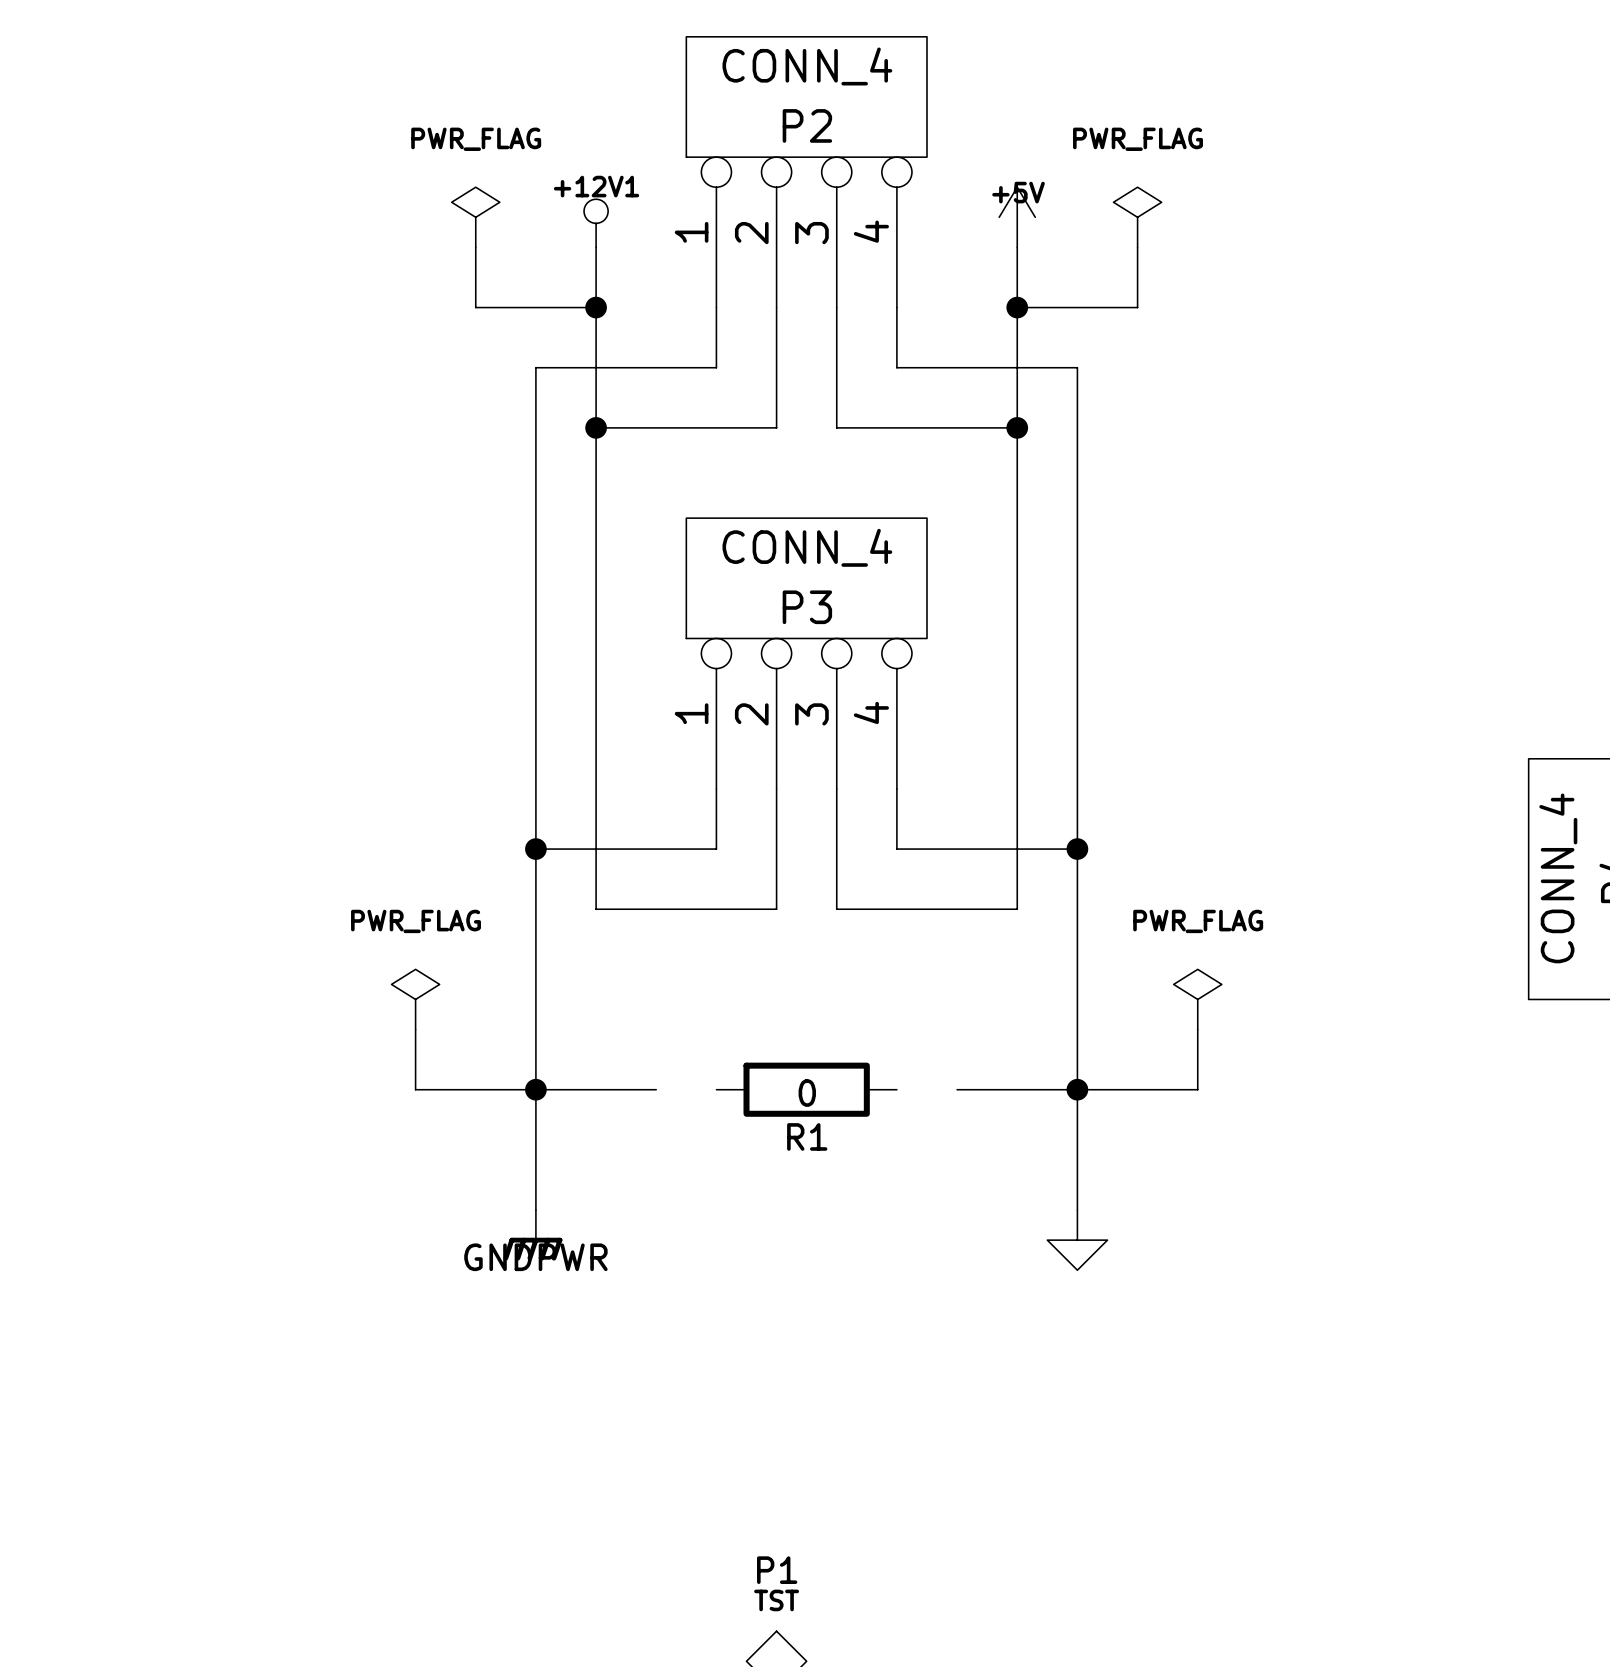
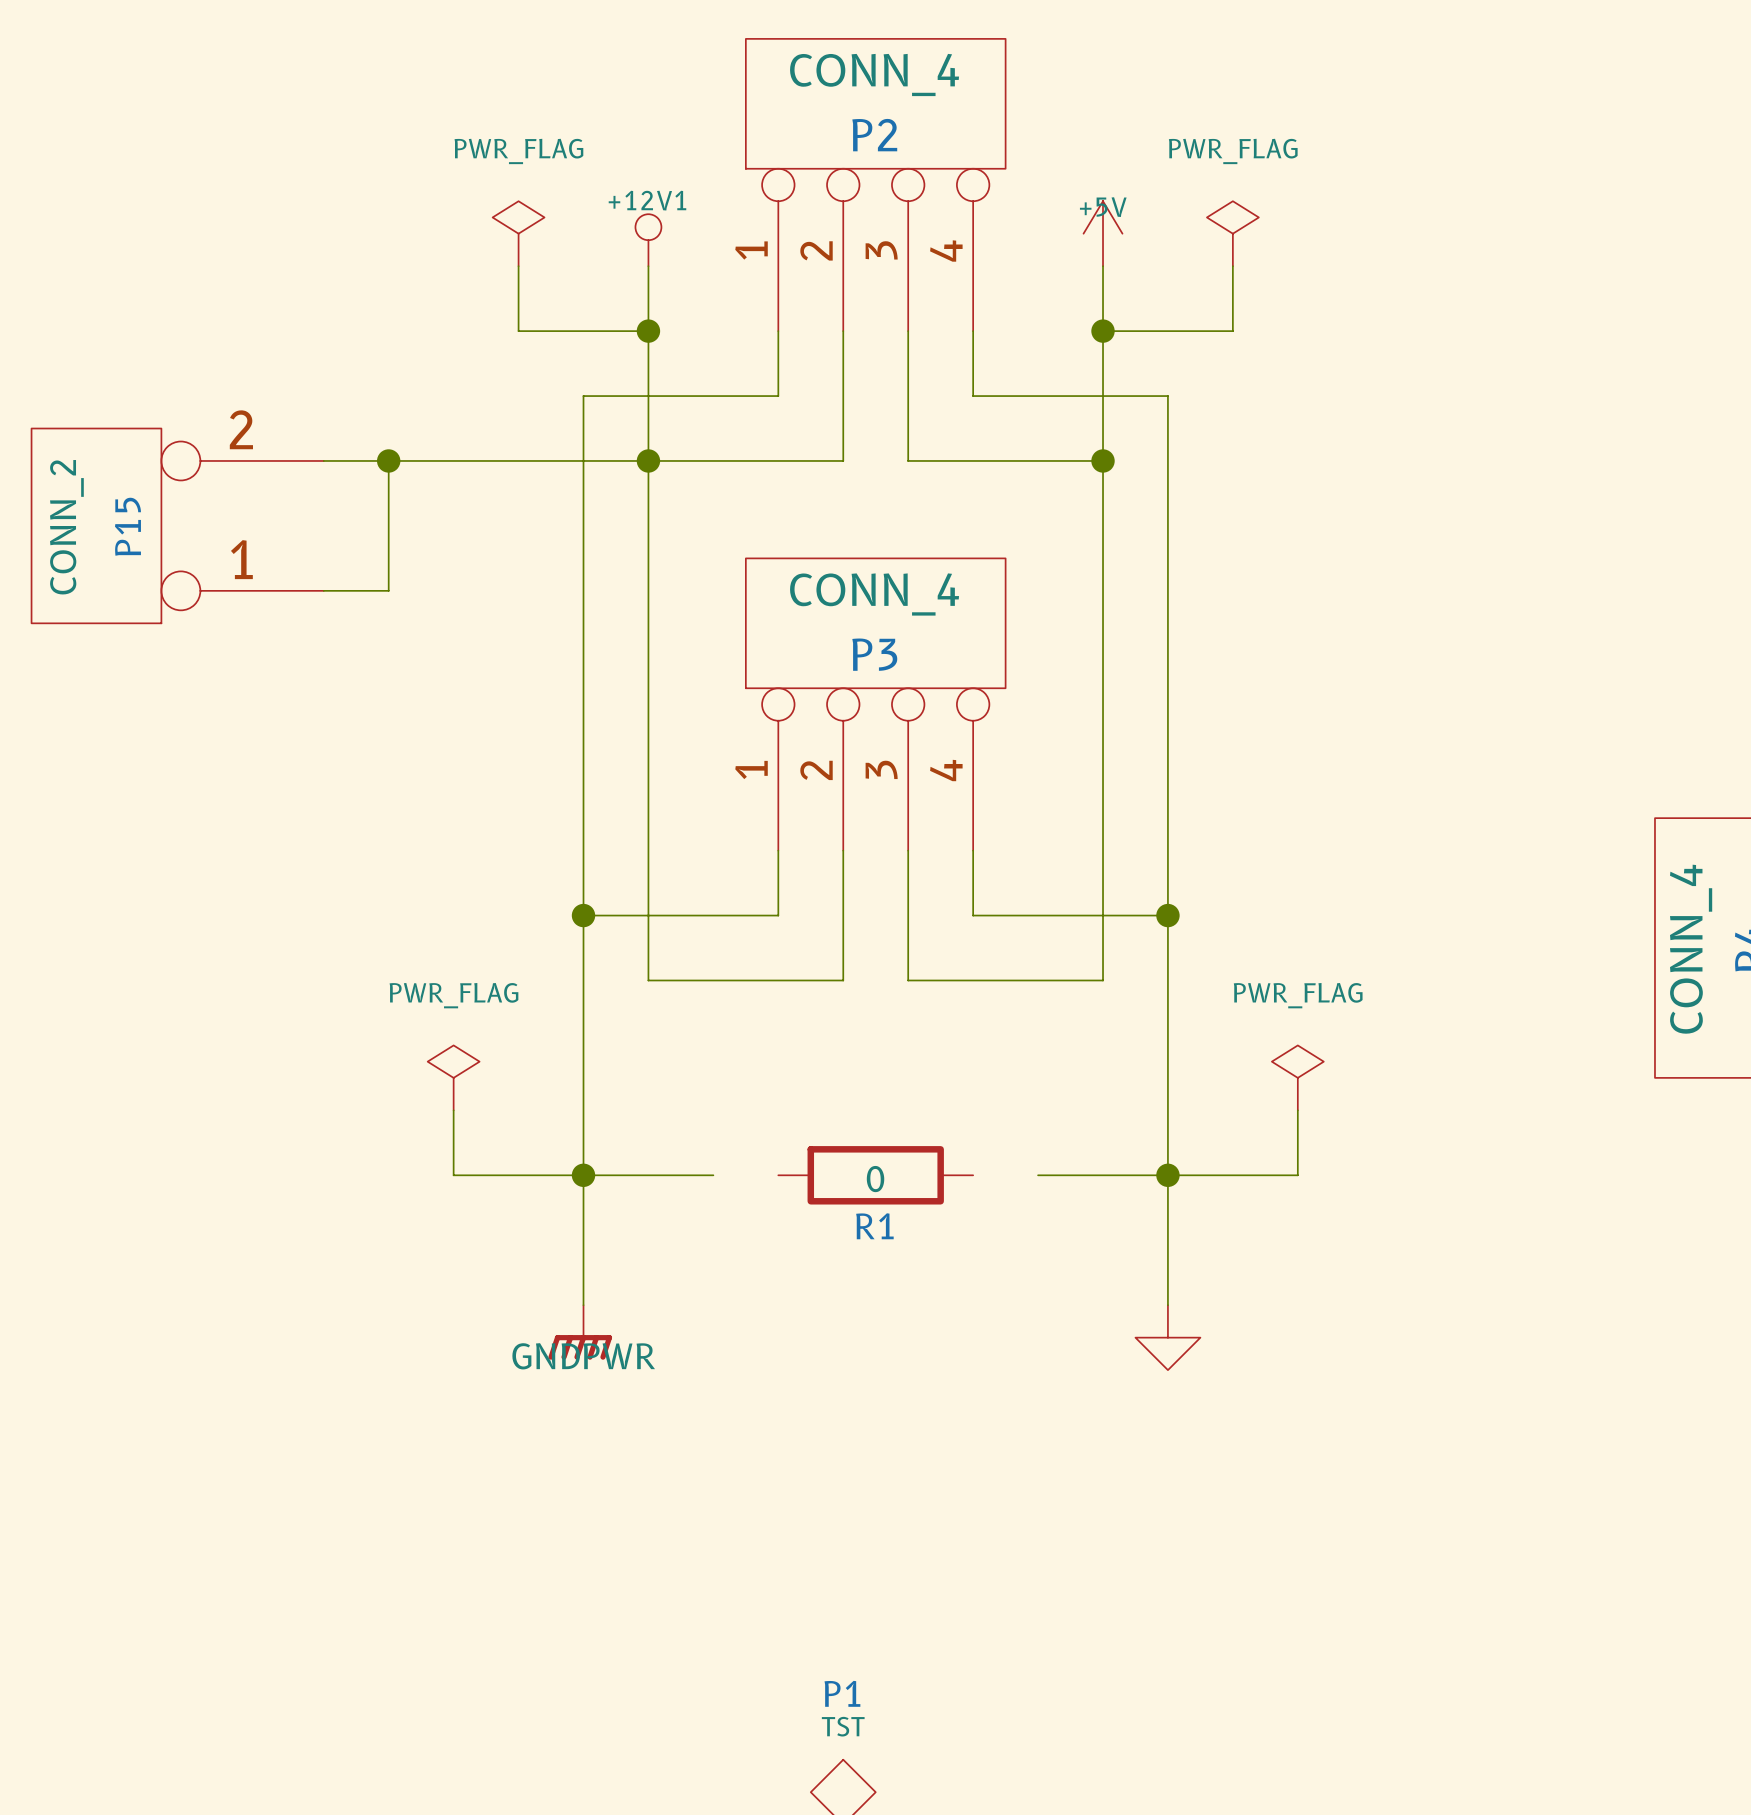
wire: none -> (323, 460) (648, 460)
wire: none -> (388, 460) (388, 590) (323, 590)
junction: none -> (388, 460)
P15: none -> CONN_2 (177, 525)

